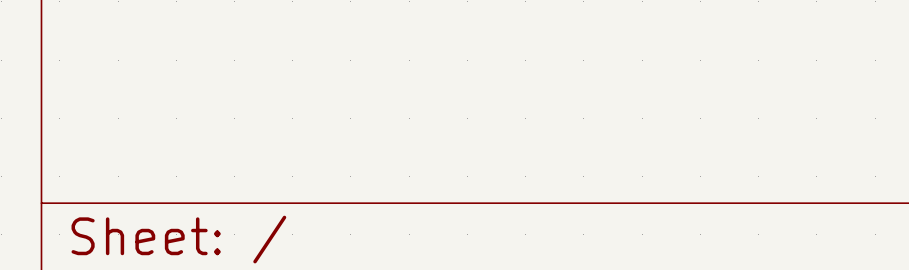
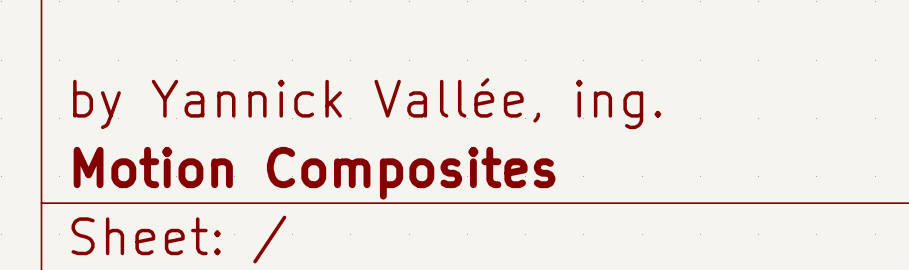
title block: none -> by Yannick Vallée, ing. (367, 103)
title block: none -> Motion Composites (314, 173)

